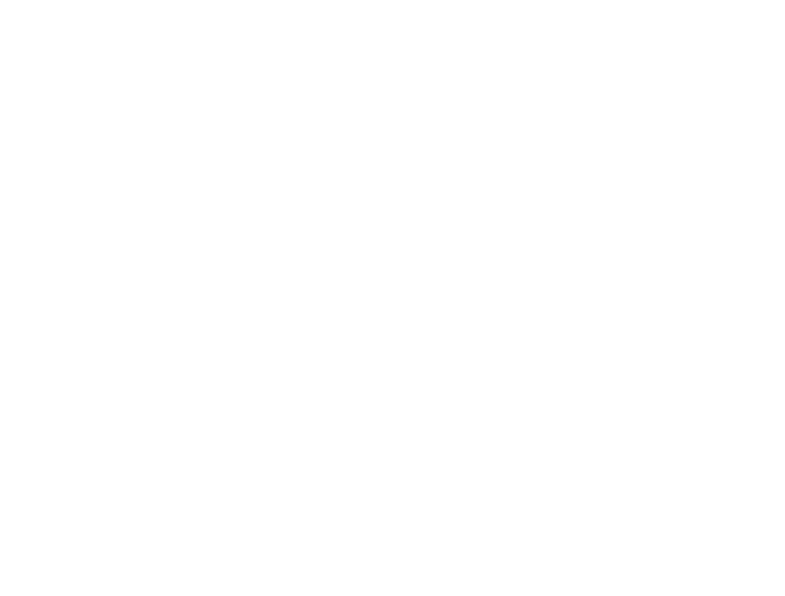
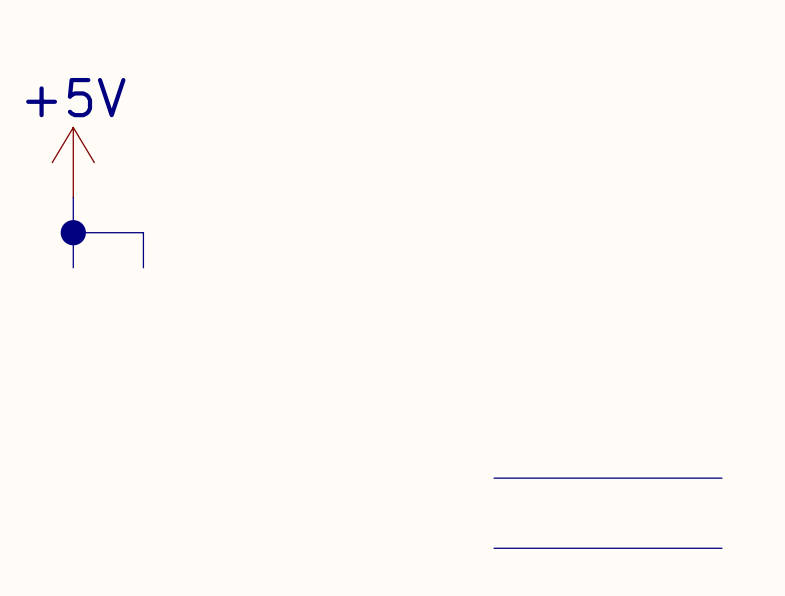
power symbol: none -> +5V (73, 162)
wire: none -> (73, 197) (73, 267)
wire: none -> (73, 232) (143, 232) (143, 267)
junction: none -> (73, 232)
wire: none -> (494, 478) (721, 478)
wire: none -> (494, 548) (721, 548)

